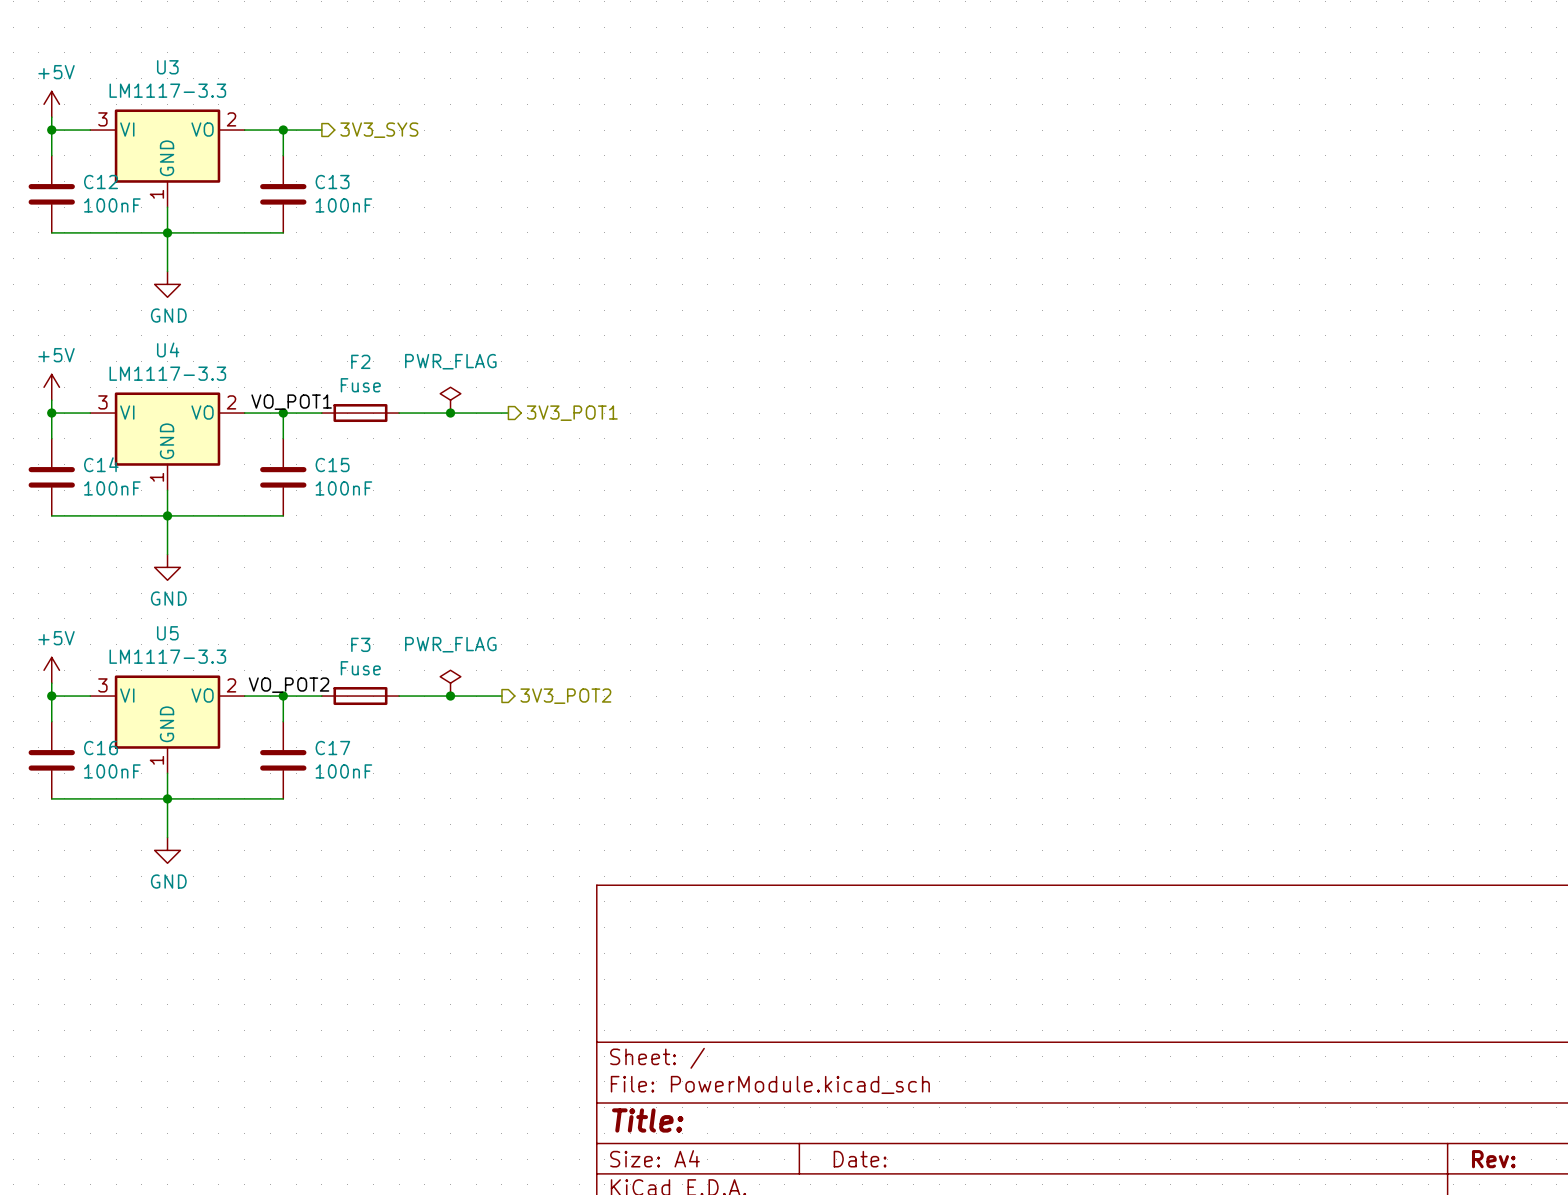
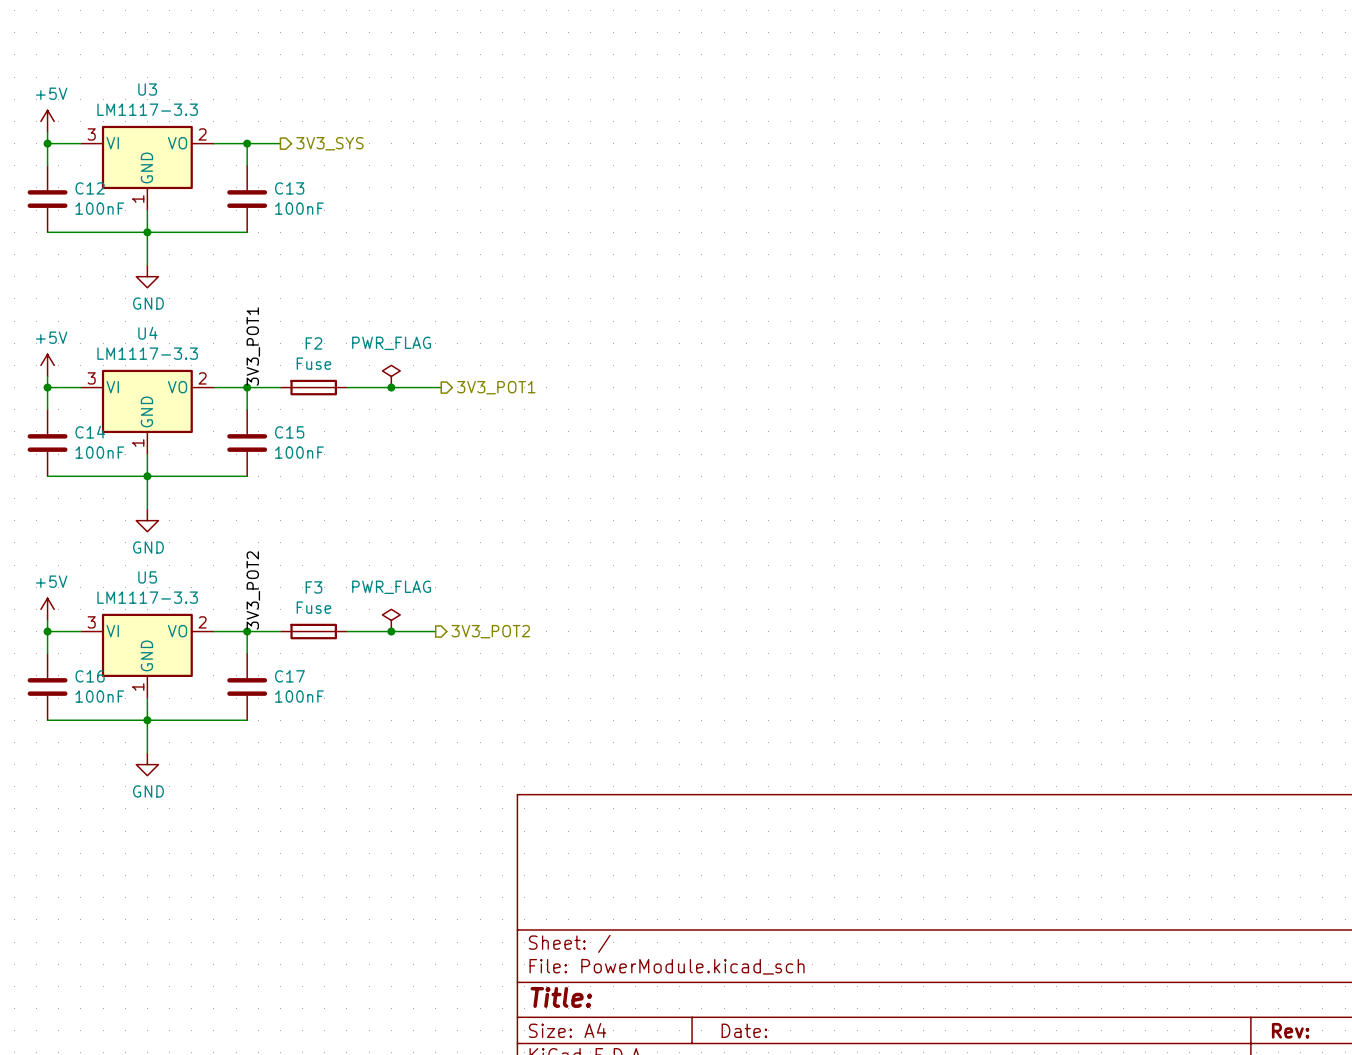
label: VO_POT1 (291, 402) -> 3V3_POT1 (253, 346)
label: VO_POT2 (289, 685) -> 3V3_POT2 (253, 590)

